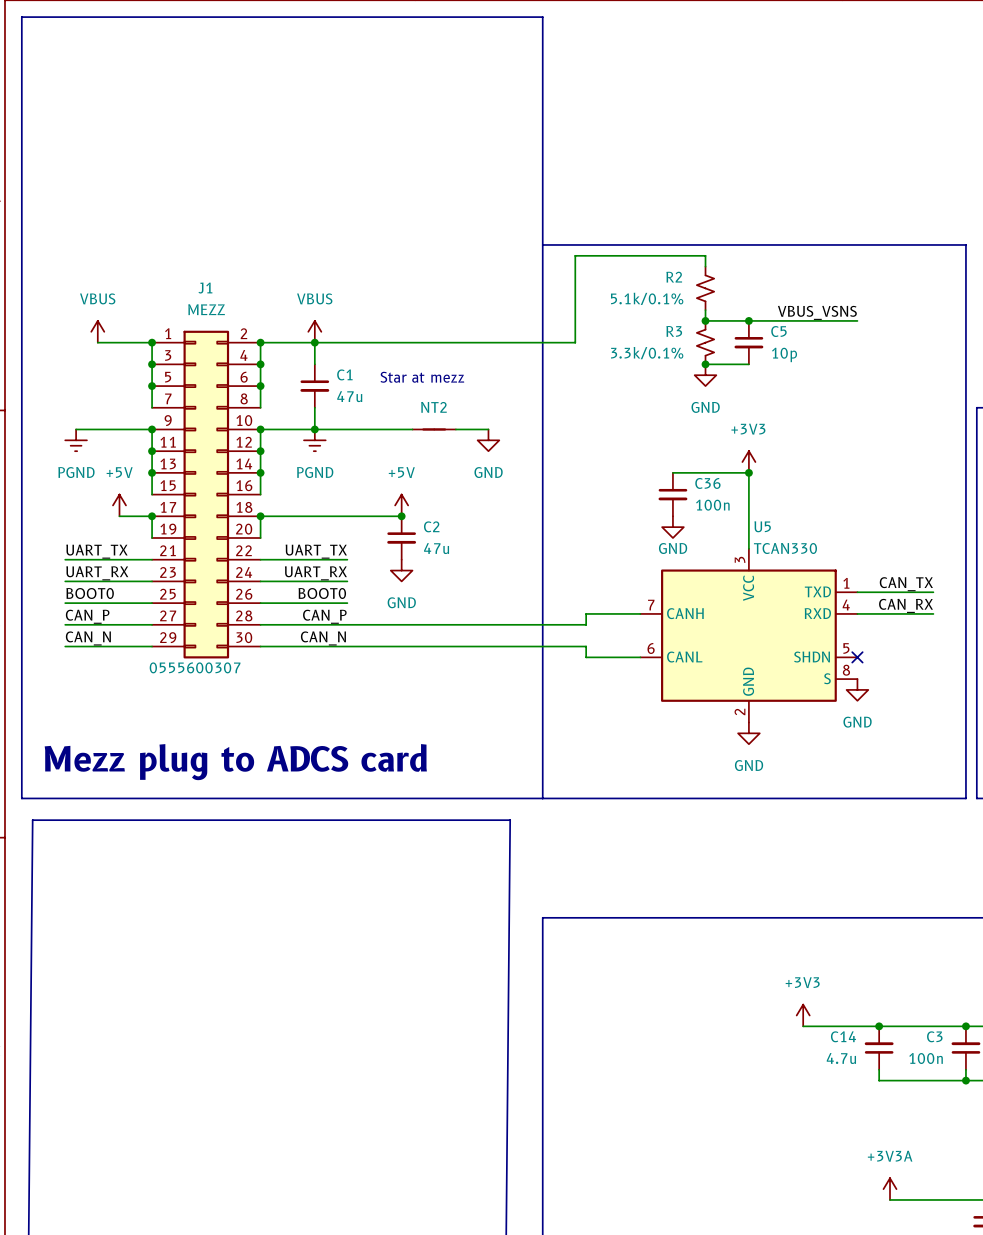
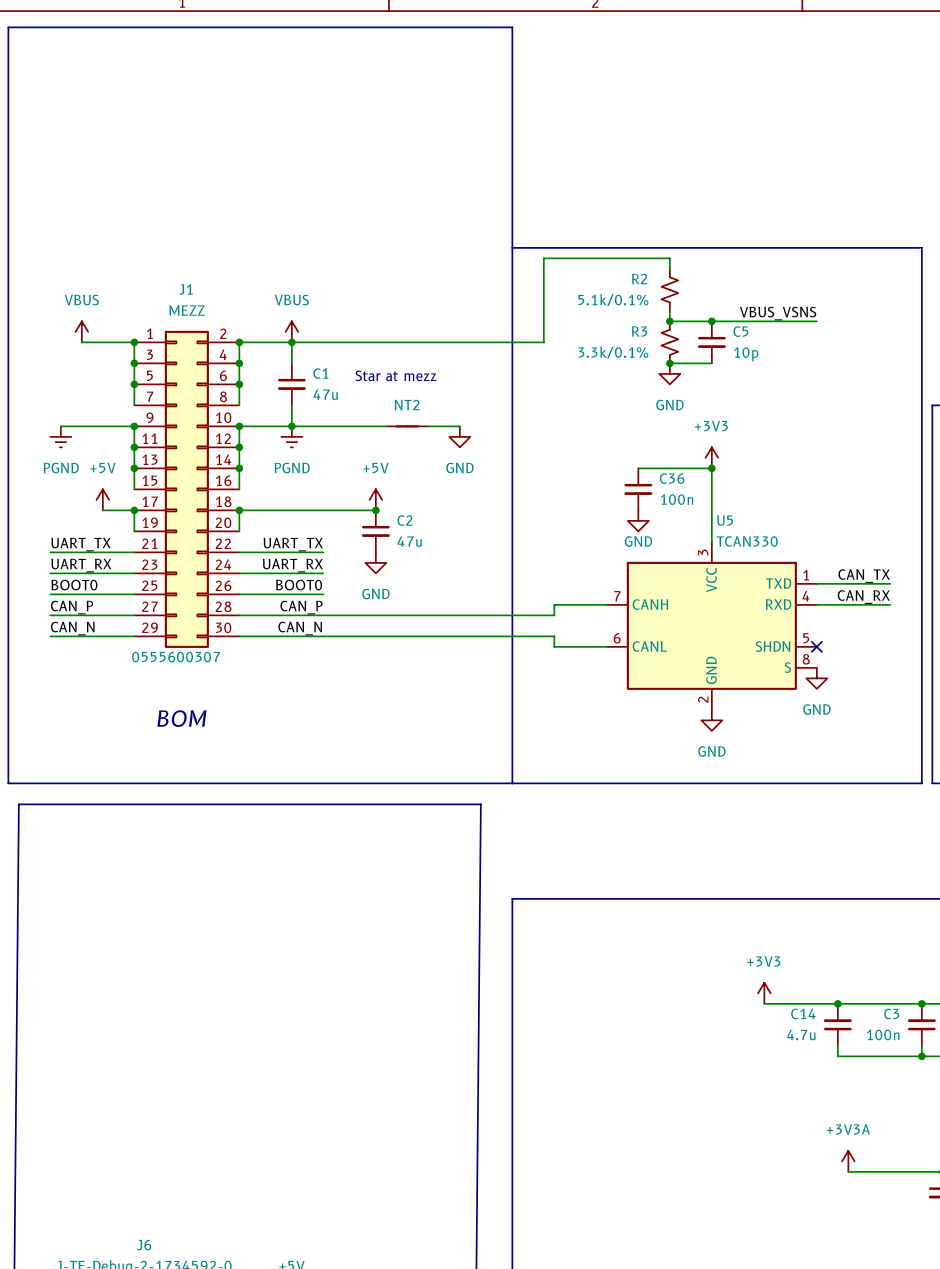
text: none -> BOM (181, 718)
text: Mezz plug to ADCS card (235, 762) -> none

